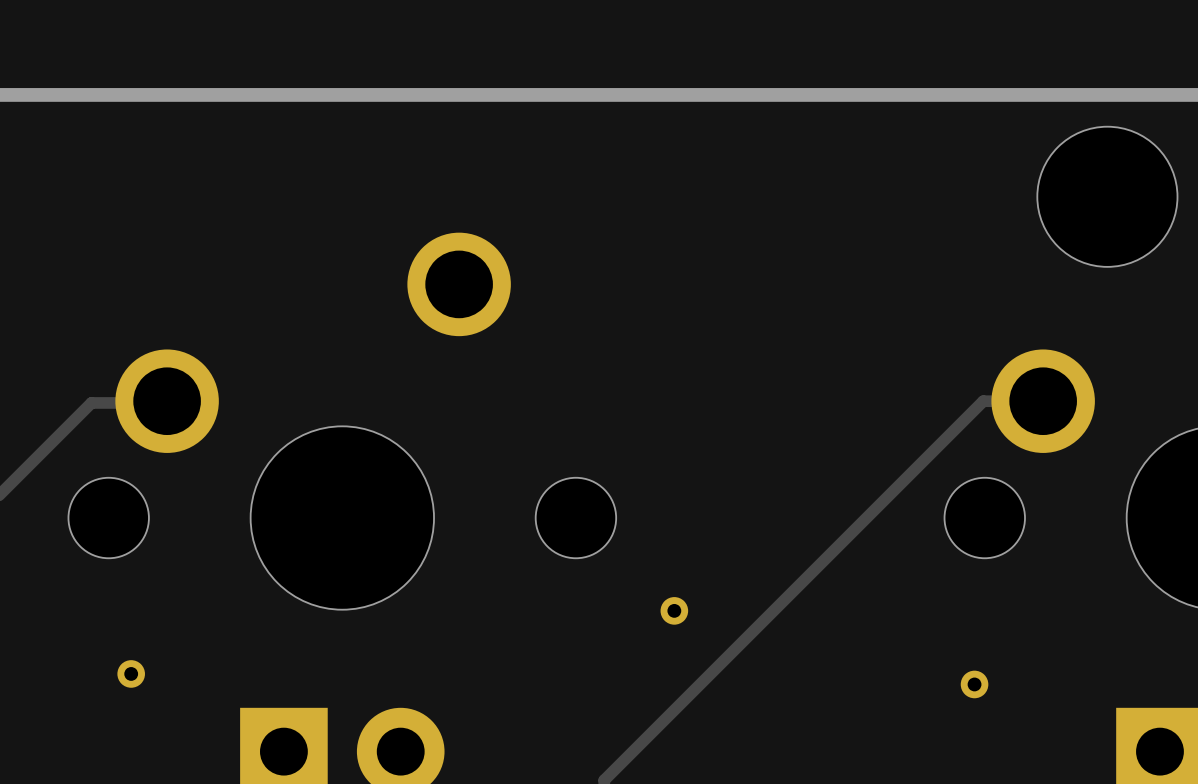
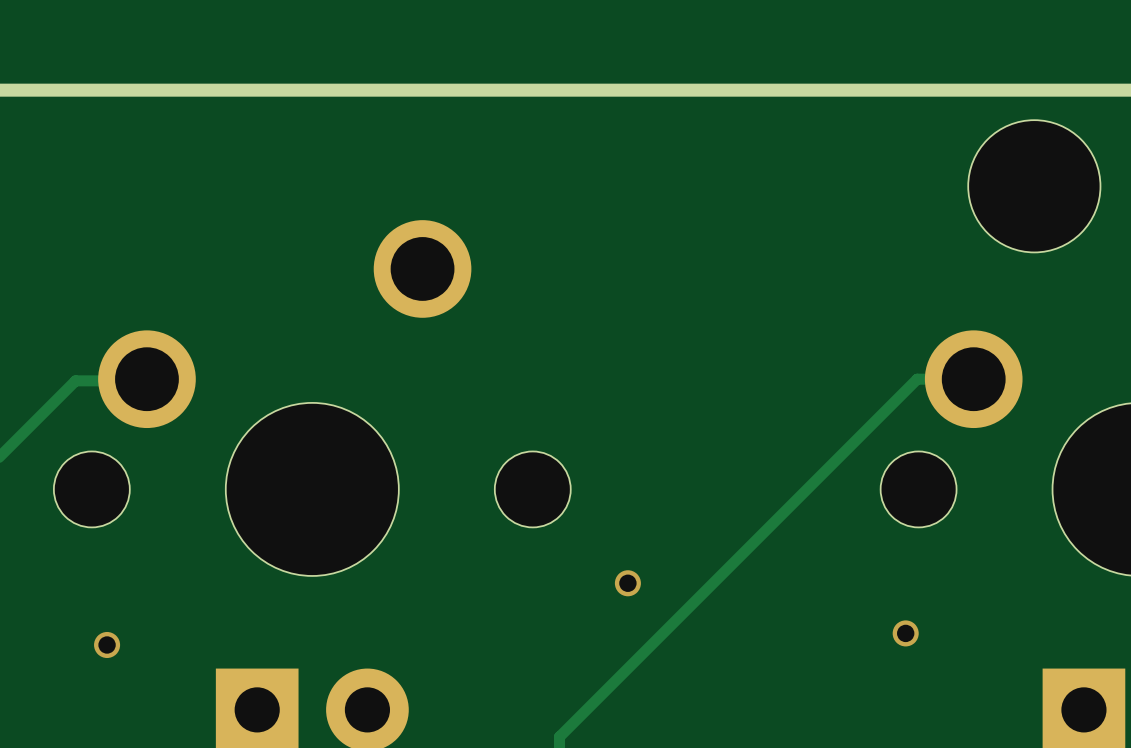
part: (674, 610) -> none
via: none -> (627, 583)
via: none -> (905, 633)
part: (131, 673) -> none
via: none -> (107, 644)
part: (974, 684) -> none

